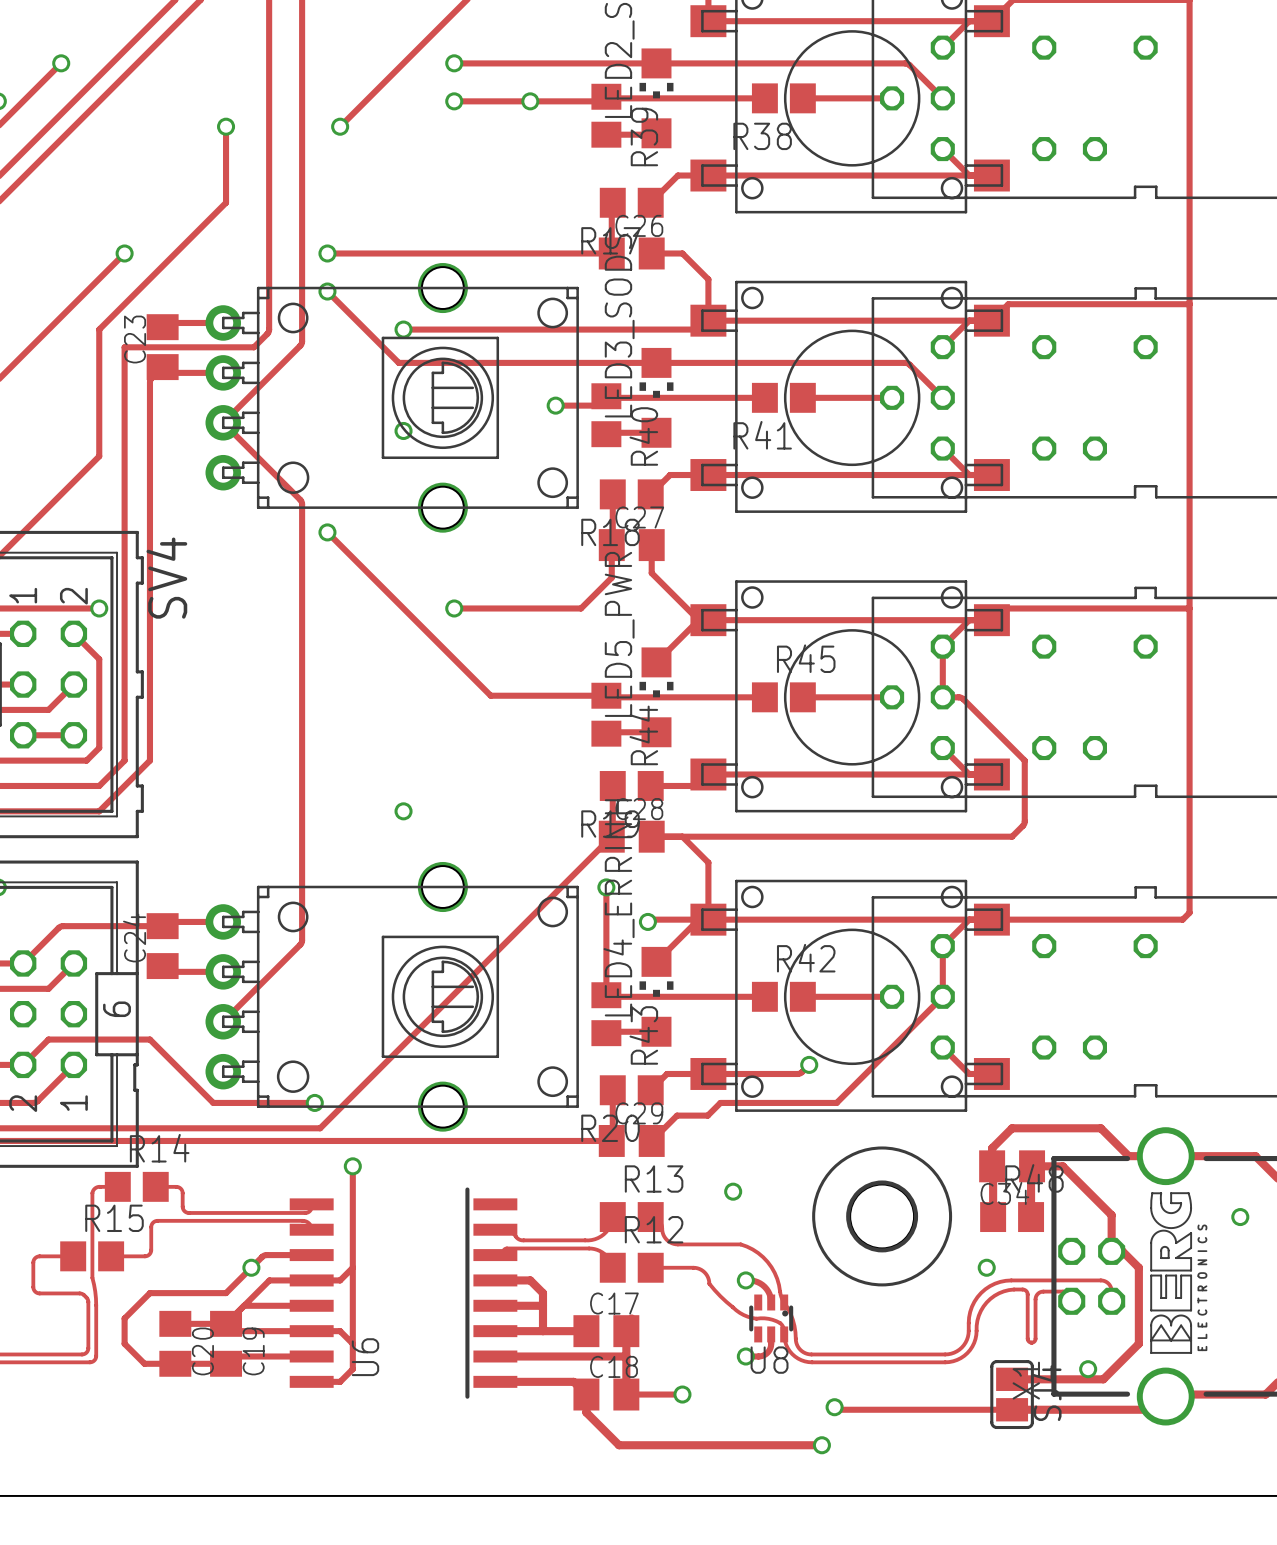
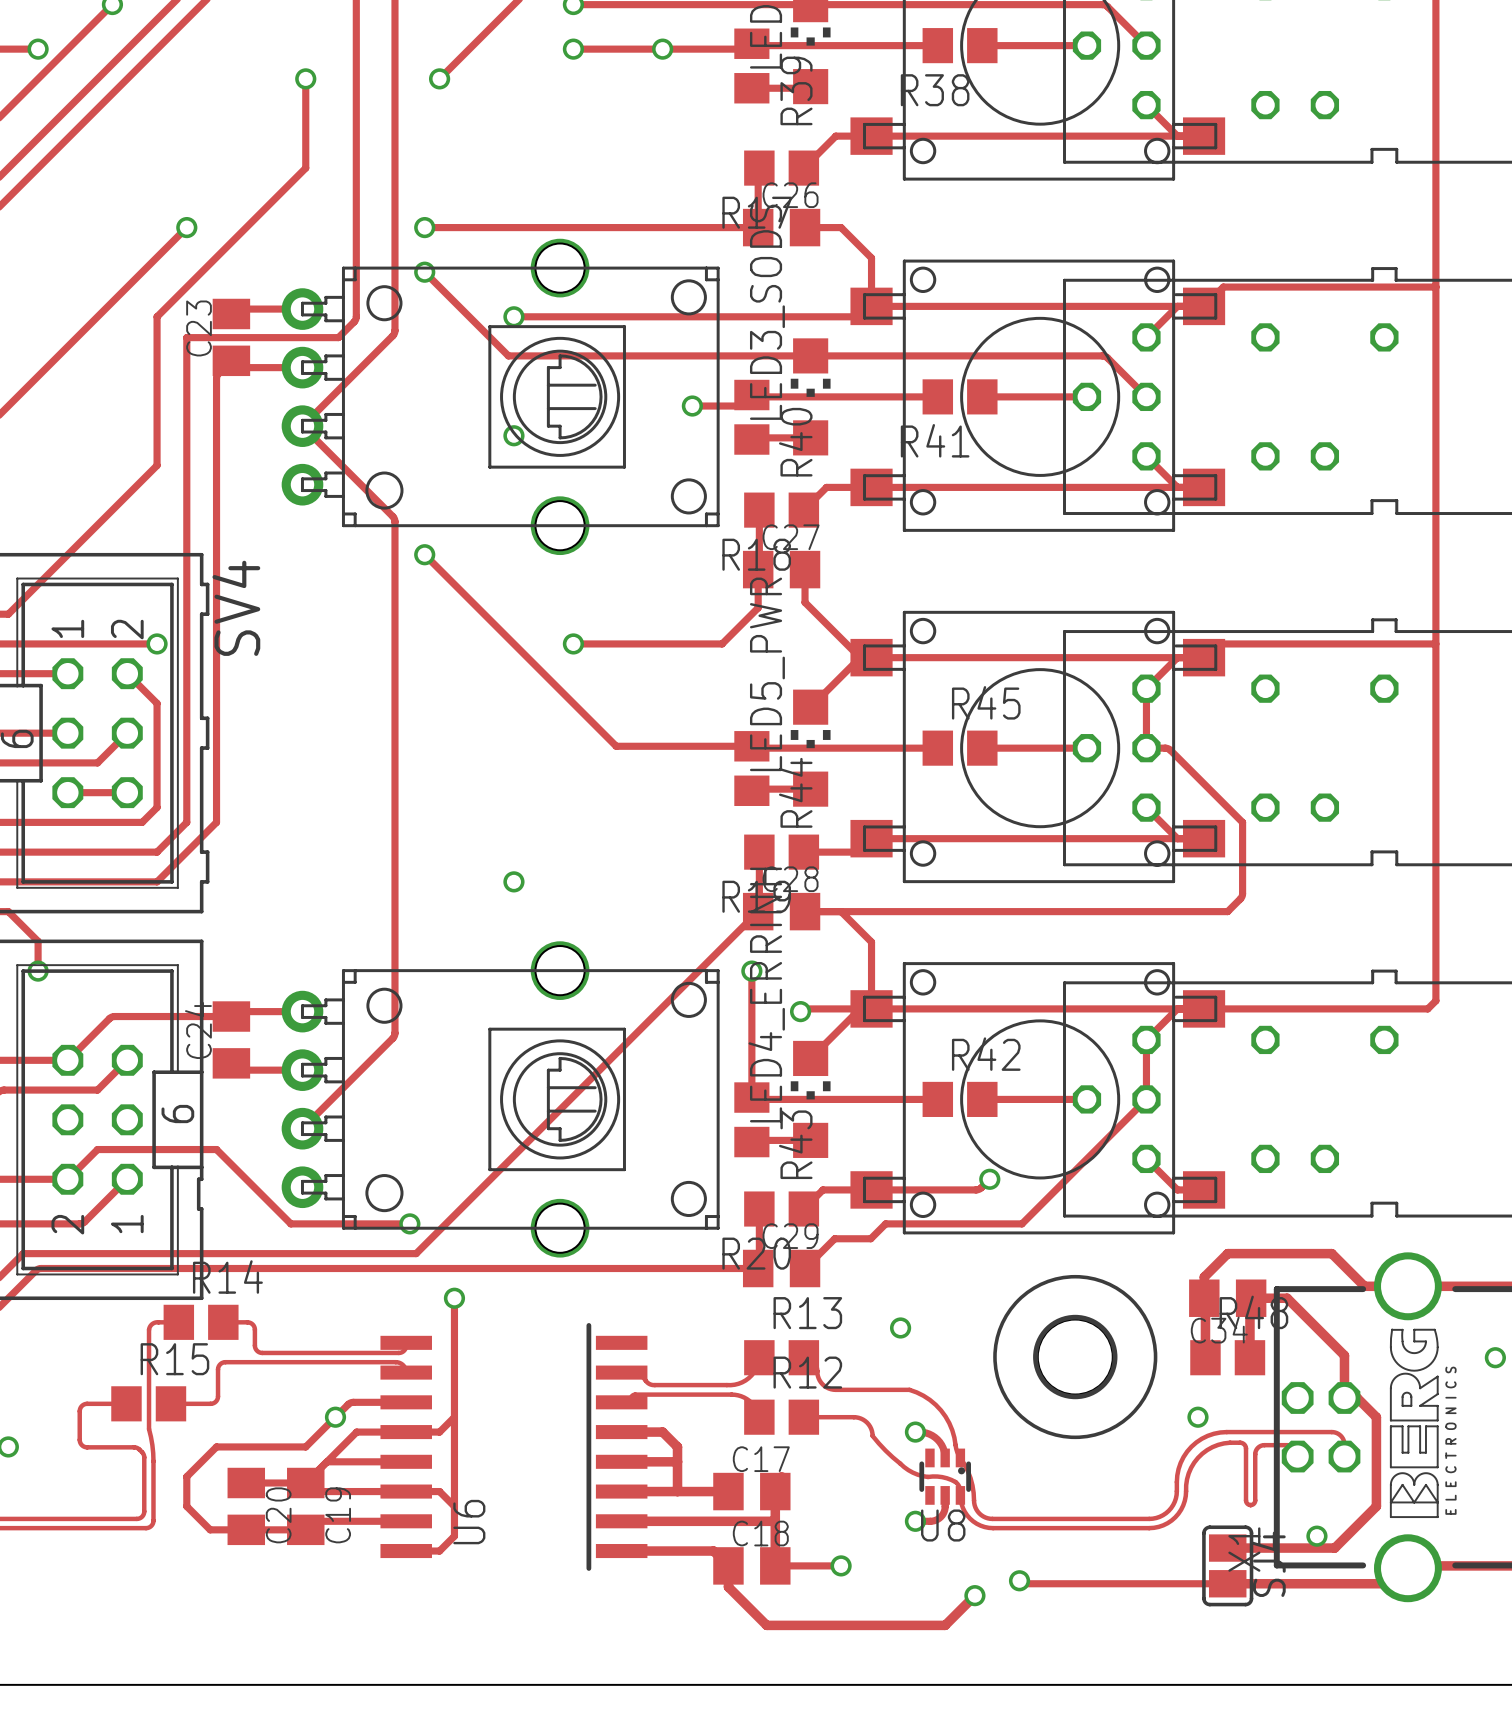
track: (771, 1445) (821, 1445) -> (945, 1625) (974, 1595)
via position: (821, 1445) -> (974, 1595)

